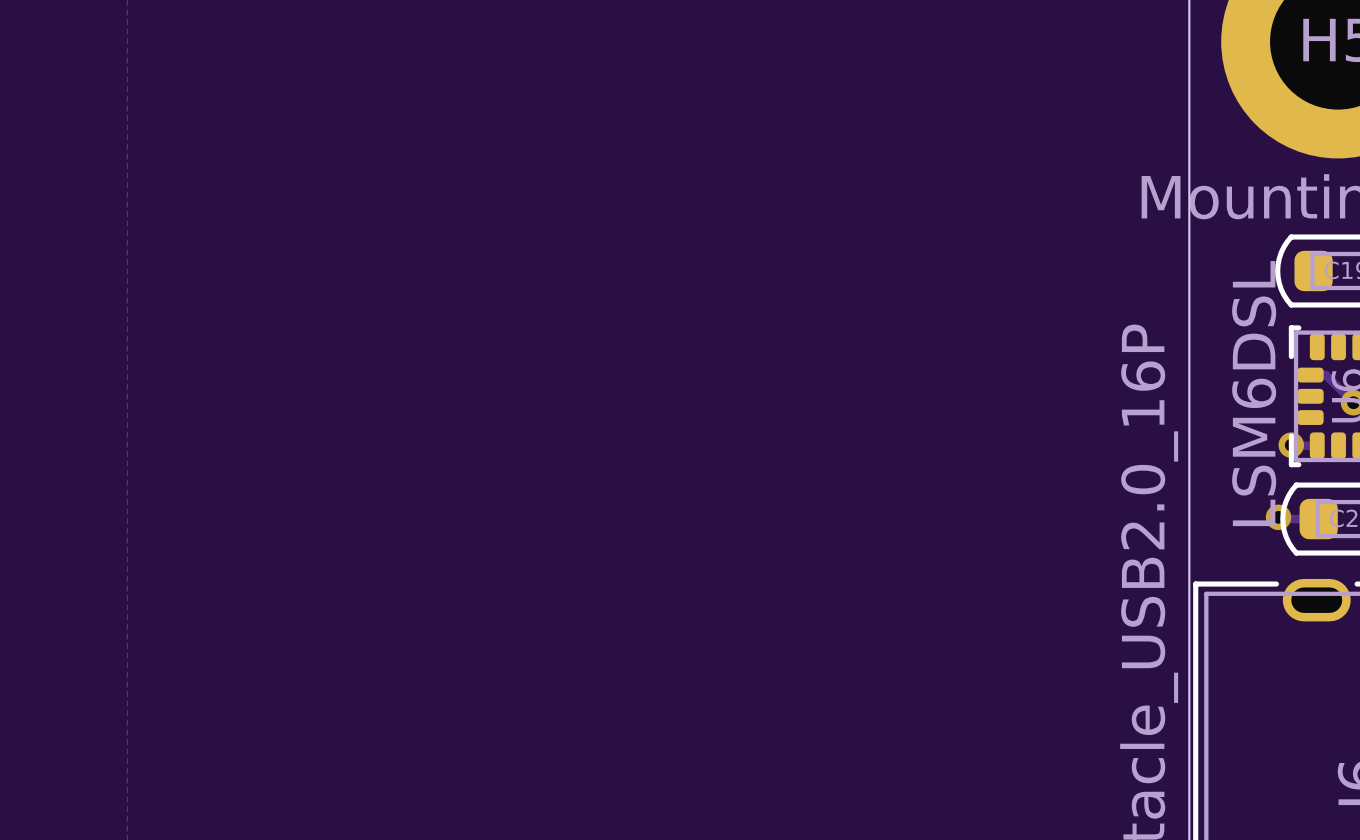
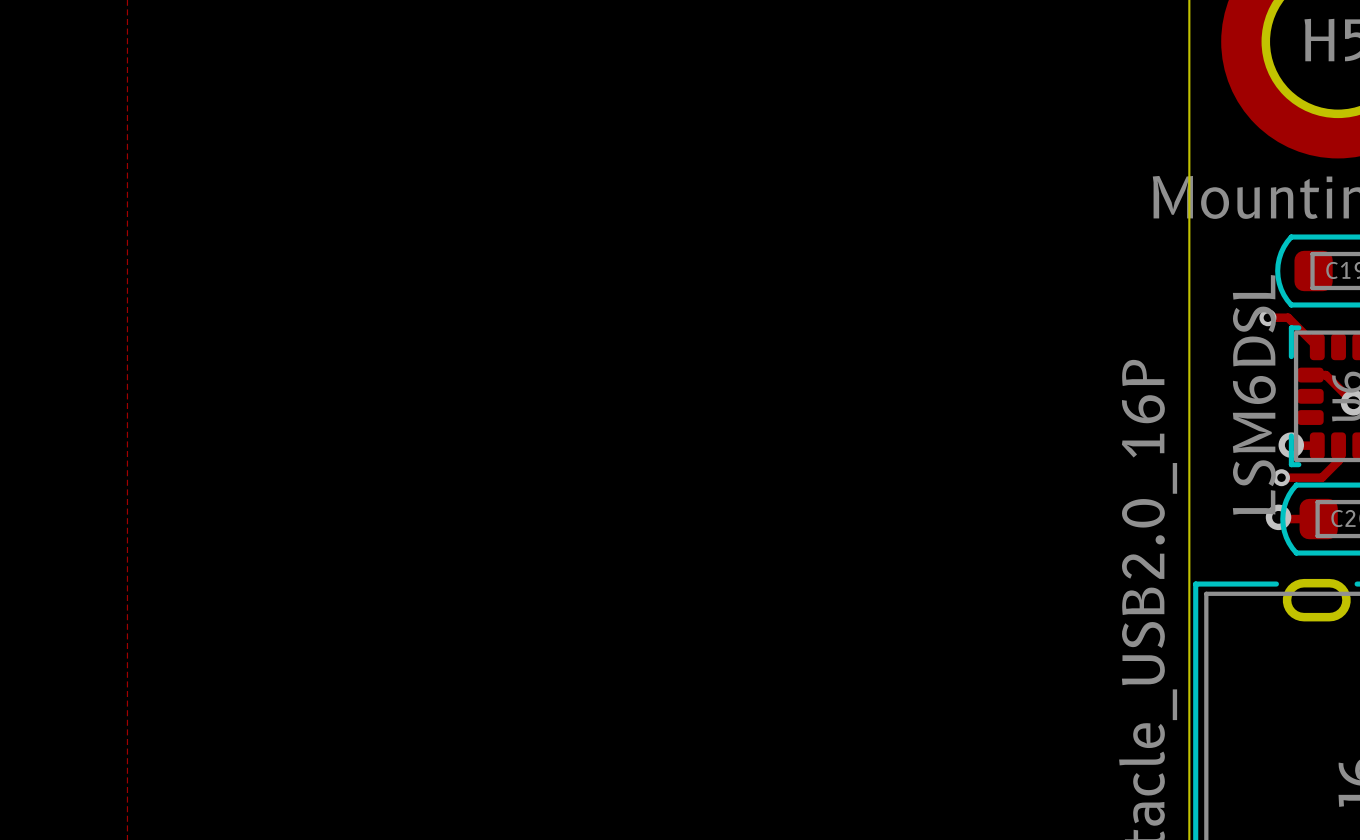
track: none -> (1267, 317) (1288, 317) (1317, 346)
via: none -> (1267, 317)
track: none -> (1338, 445) (1338, 461) (1321, 477) (1281, 477)
via: none -> (1281, 477)

